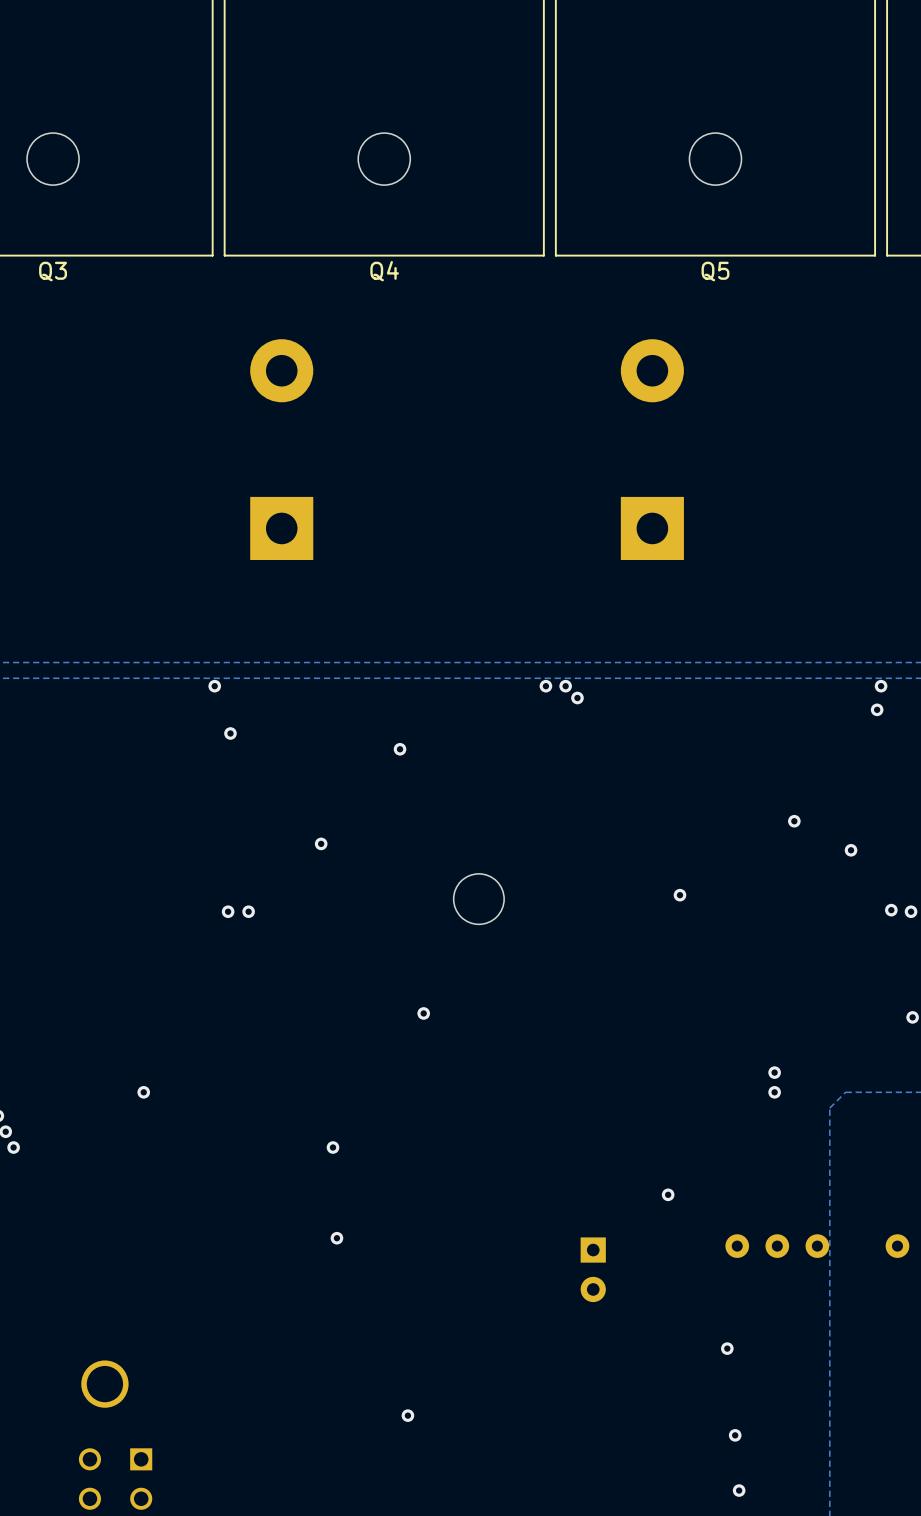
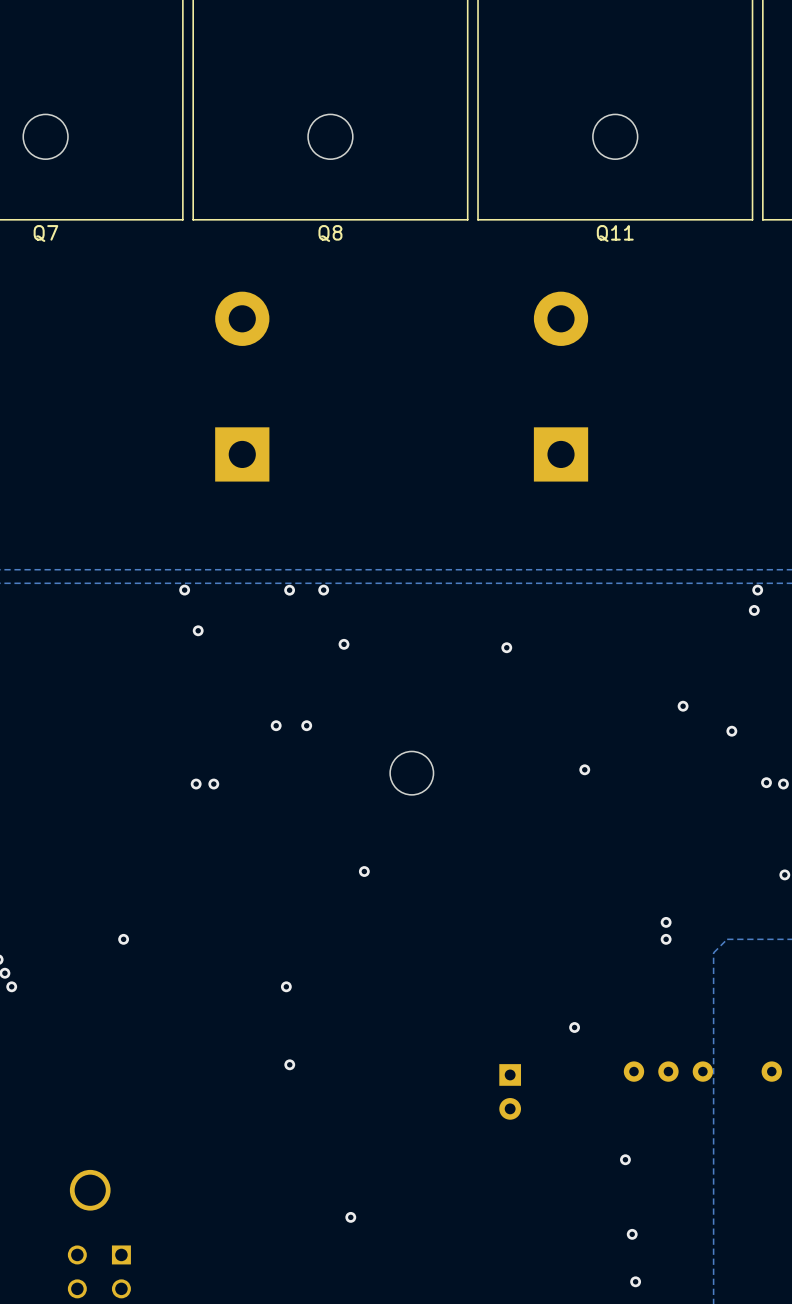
Q3 name: Q3 (53, 271) -> Q7 (45, 233)
Q4 name: Q4 (384, 271) -> Q8 (330, 233)
Q5 name: Q5 (715, 271) -> Q11 (615, 233)
via: none -> (289, 590)
via: none -> (323, 590)
via: (545, 686) -> none
via: (565, 686) -> none
via: (577, 698) -> none
via: none -> (506, 647)
via: none -> (306, 725)

